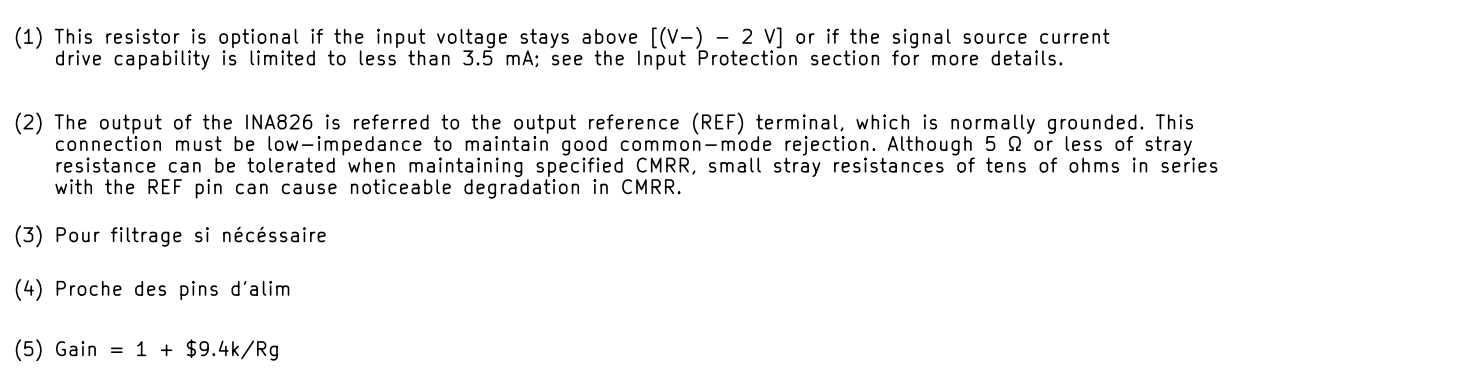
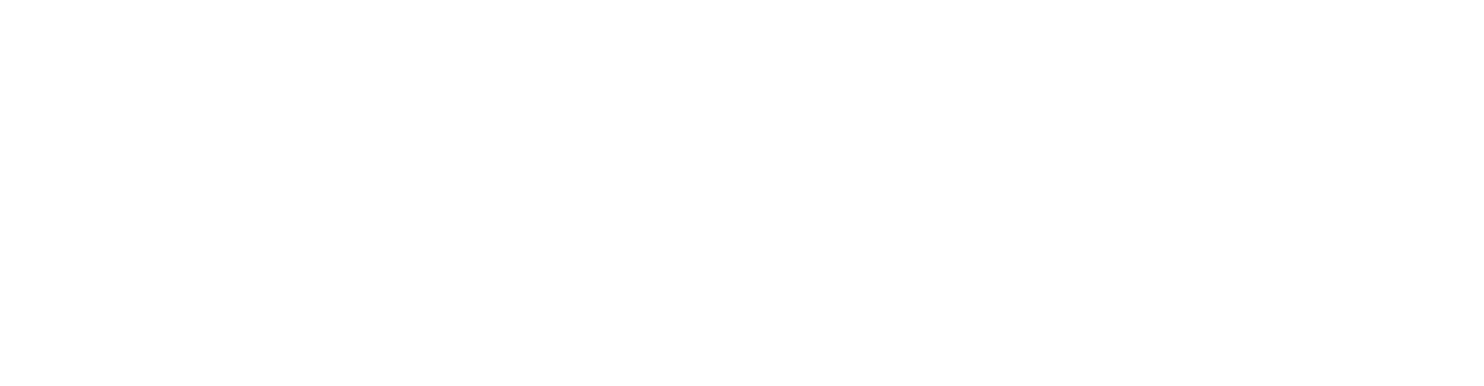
text: (1) This resistor is optional if the input voltage stays above [(V-) - 2 V] or if the signal source current (562, 37) -> none
text: drive capability is limited to less than 3.5 mA; see the Input Protection section for more details. (559, 60) -> none
text: (2) The output of the INA826 is referred to the output reference (REF) terminal, which is normally grounded. This (604, 123) -> none
text: connection must be low-impedance to maintain good common-mode rejection. Although 5 Ω or less of stray (623, 145) -> none
text: resistance can be tolerated when maintaining specified CMRR, small stray resistances of tens of ohms in series (637, 167) -> none
text: with the REF pin can cause noticeable degradation in CMRR. (367, 188) -> none
text: (3) Pour filtrage si nécéssaire (170, 236) -> none
text: (4) Proche des pins d'alim (152, 289) -> none
text: (5) Gain = 1 + $9.4k/Rg (146, 350) -> none

